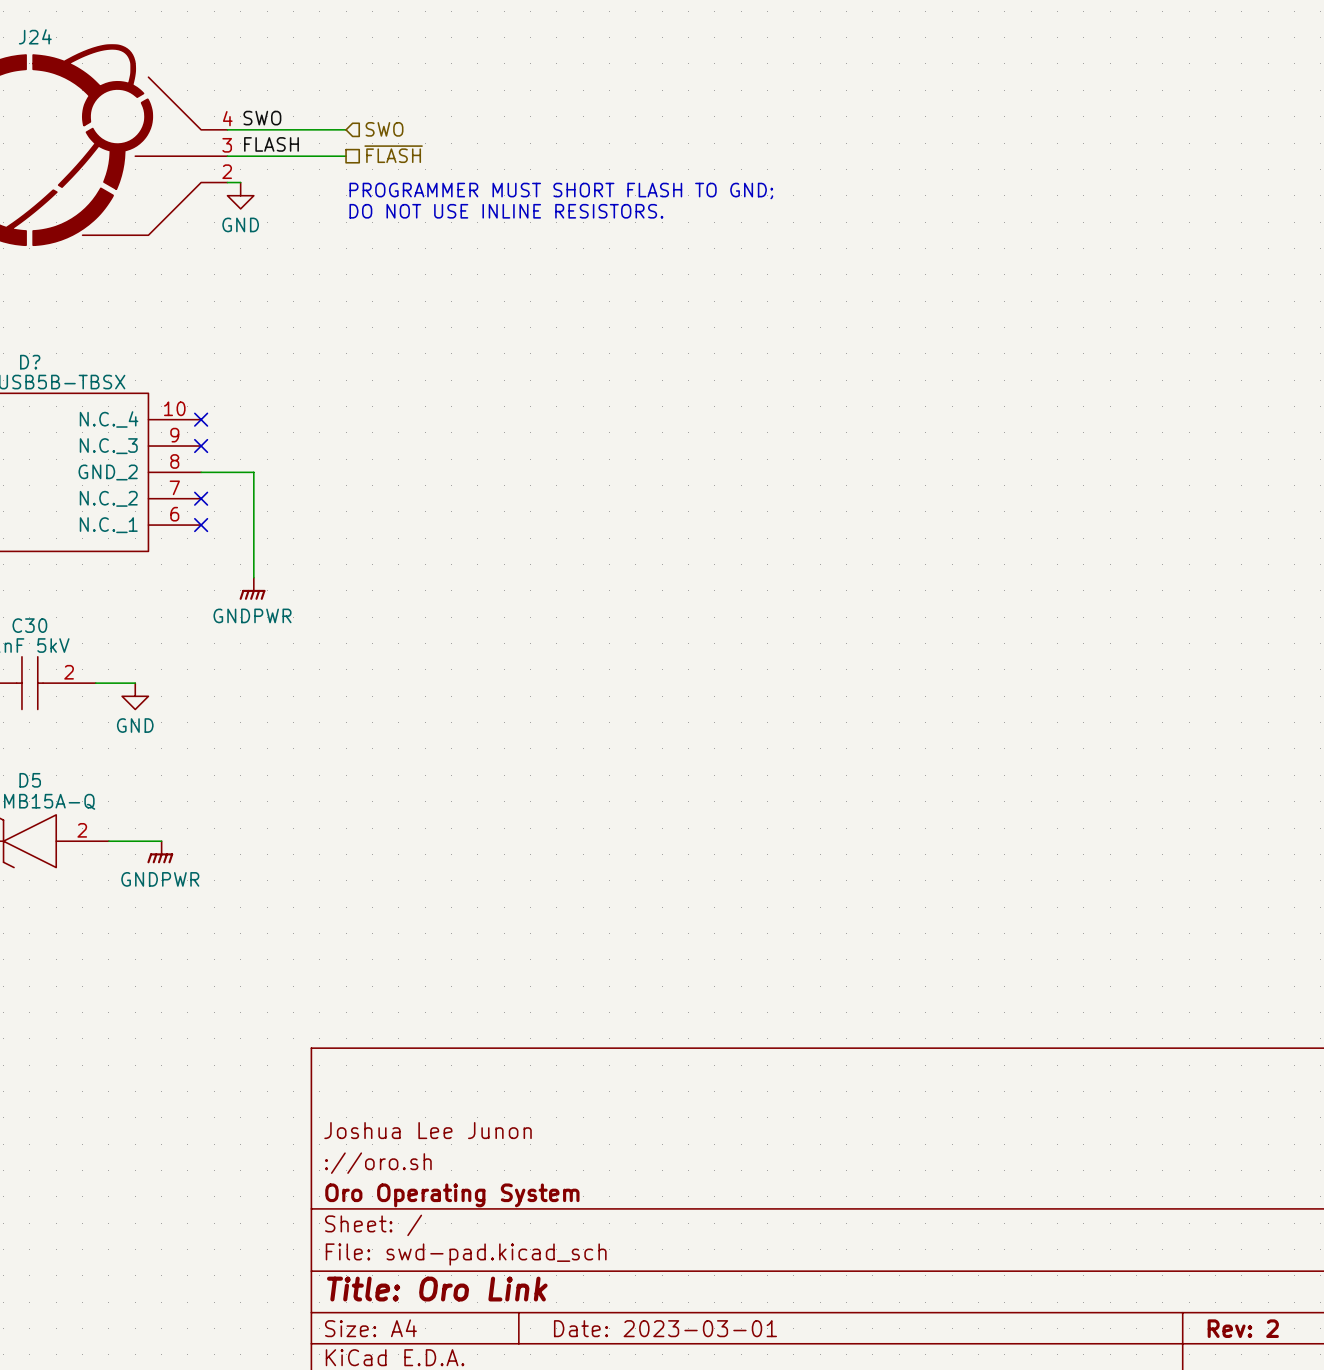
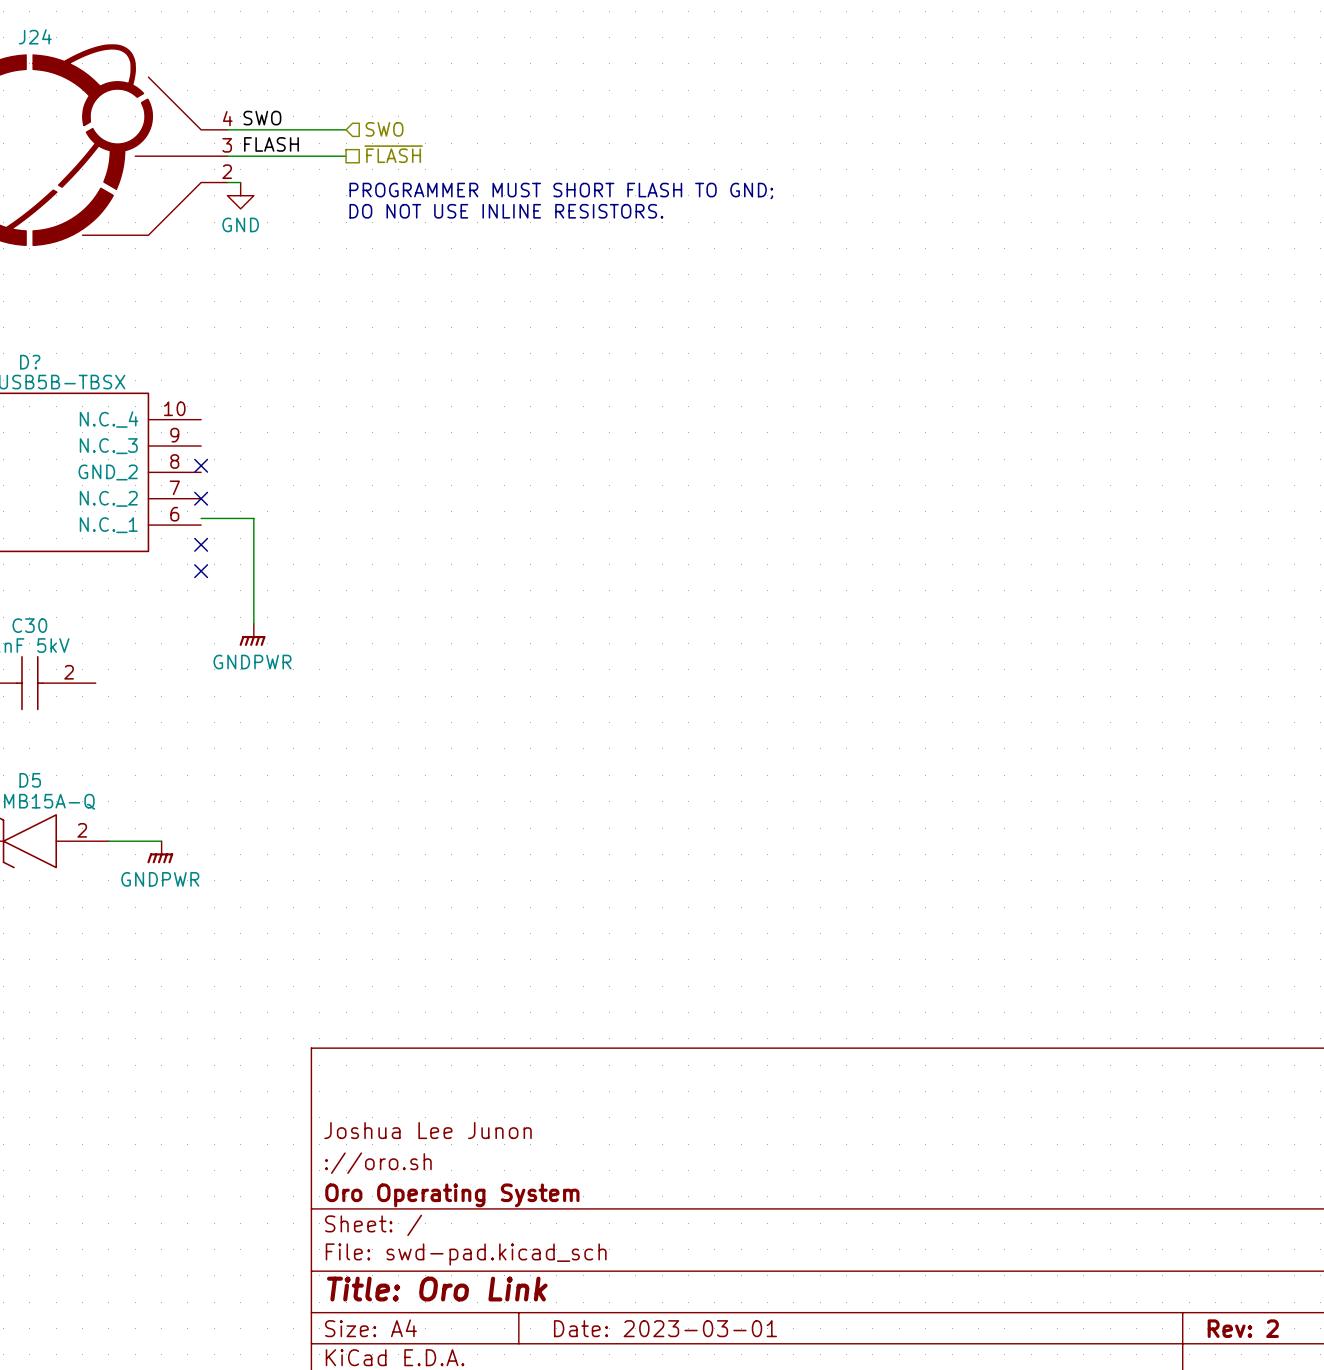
no-connect mark: (201, 419) -> none
no-connect mark position: (201, 446) -> (201, 465)
wire: (201, 472) (253, 472) (253, 518) -> (201, 518) (253, 518)
no-connect mark position: (201, 525) -> (201, 544)
no-connect mark: none -> (201, 571)
wire: none -> (253, 577) (253, 623)
power symbol position: GNDPWR (252, 588) -> GNDPWR (252, 634)
wire: (95, 683) (135, 683) -> none
power symbol: GND (135, 696) -> none

